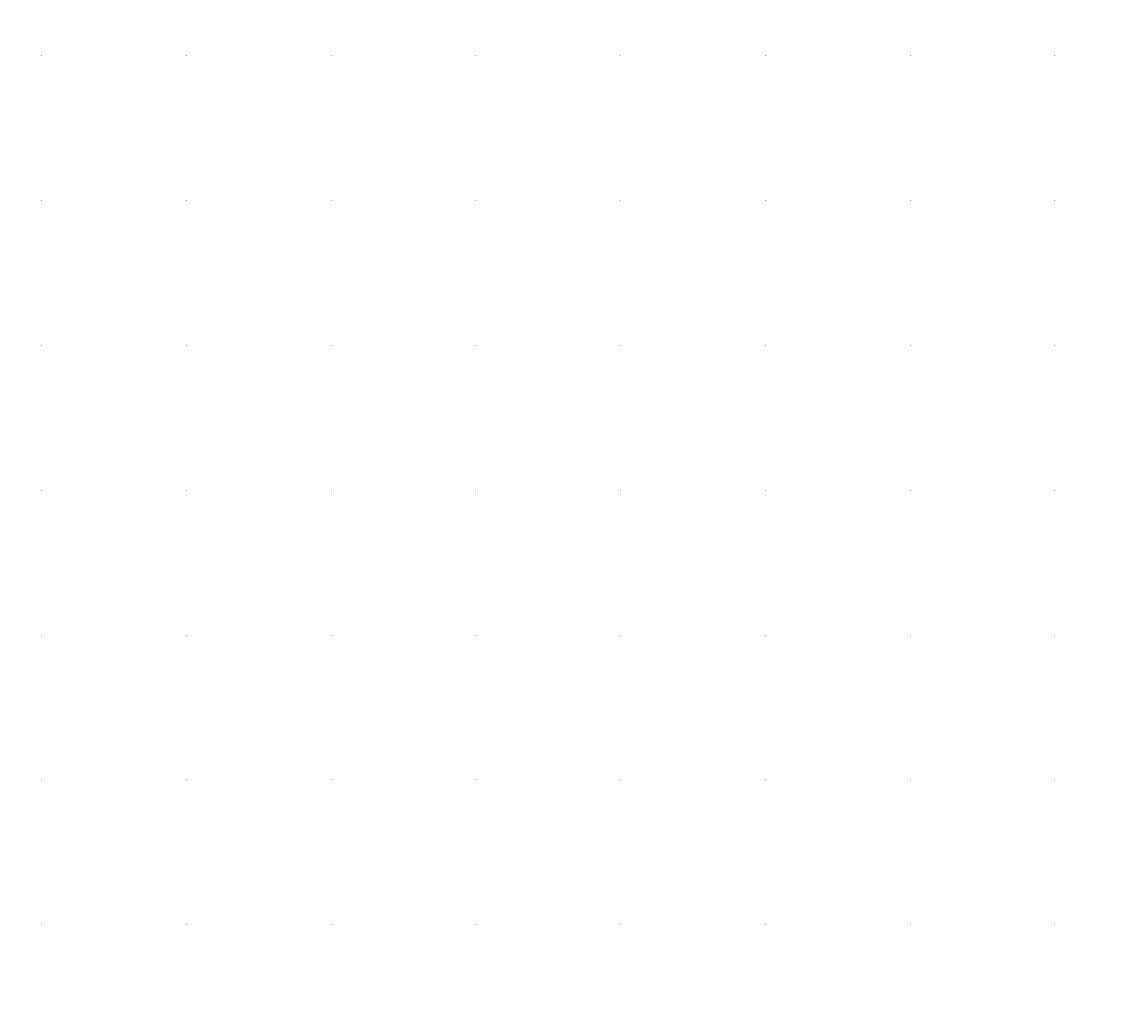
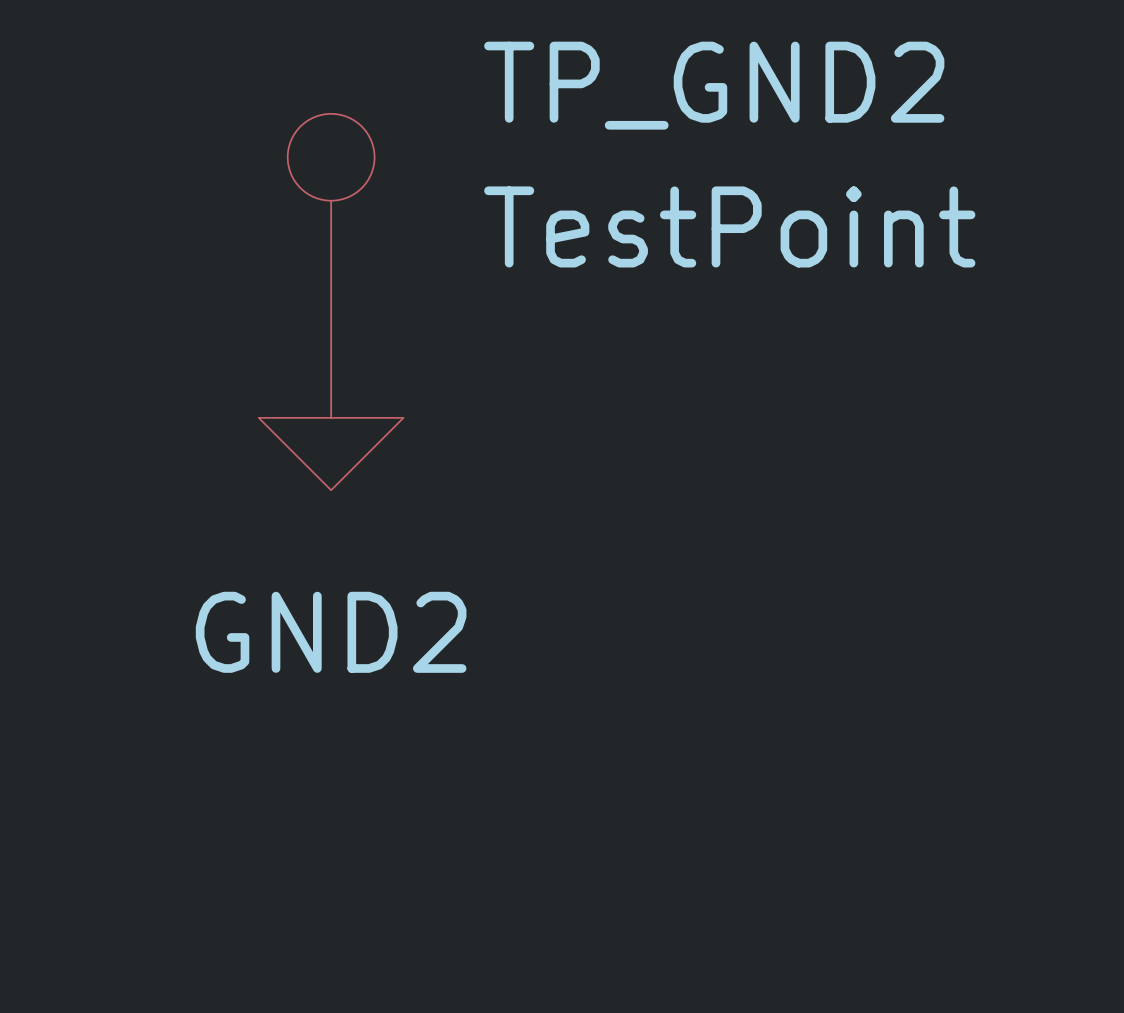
TP_GND2: none -> TestPoint (331, 229)
power symbol: none -> GND2 (331, 417)

